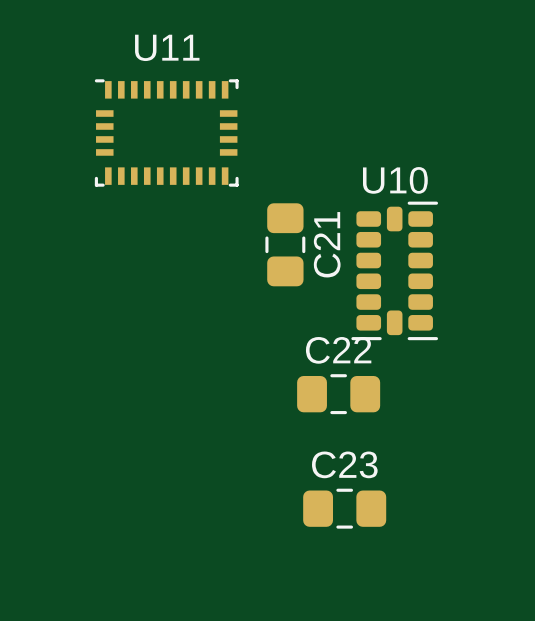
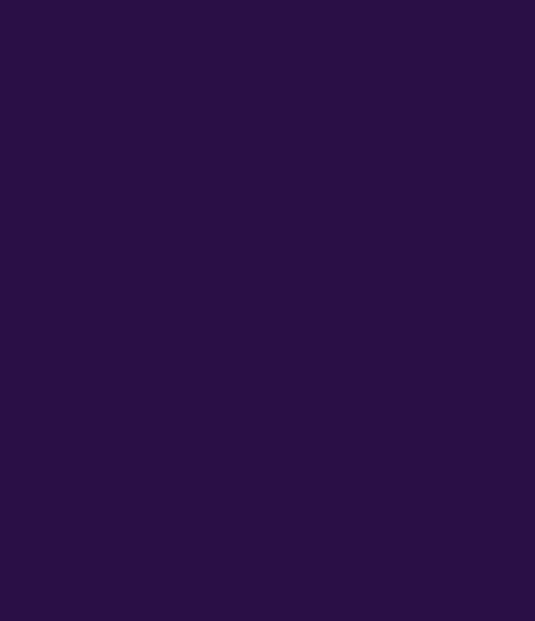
U11: (166, 132) -> none
C21: (285, 244) -> none
U10: (394, 270) -> none
C22: (338, 394) -> none
C23: (344, 508) -> none

